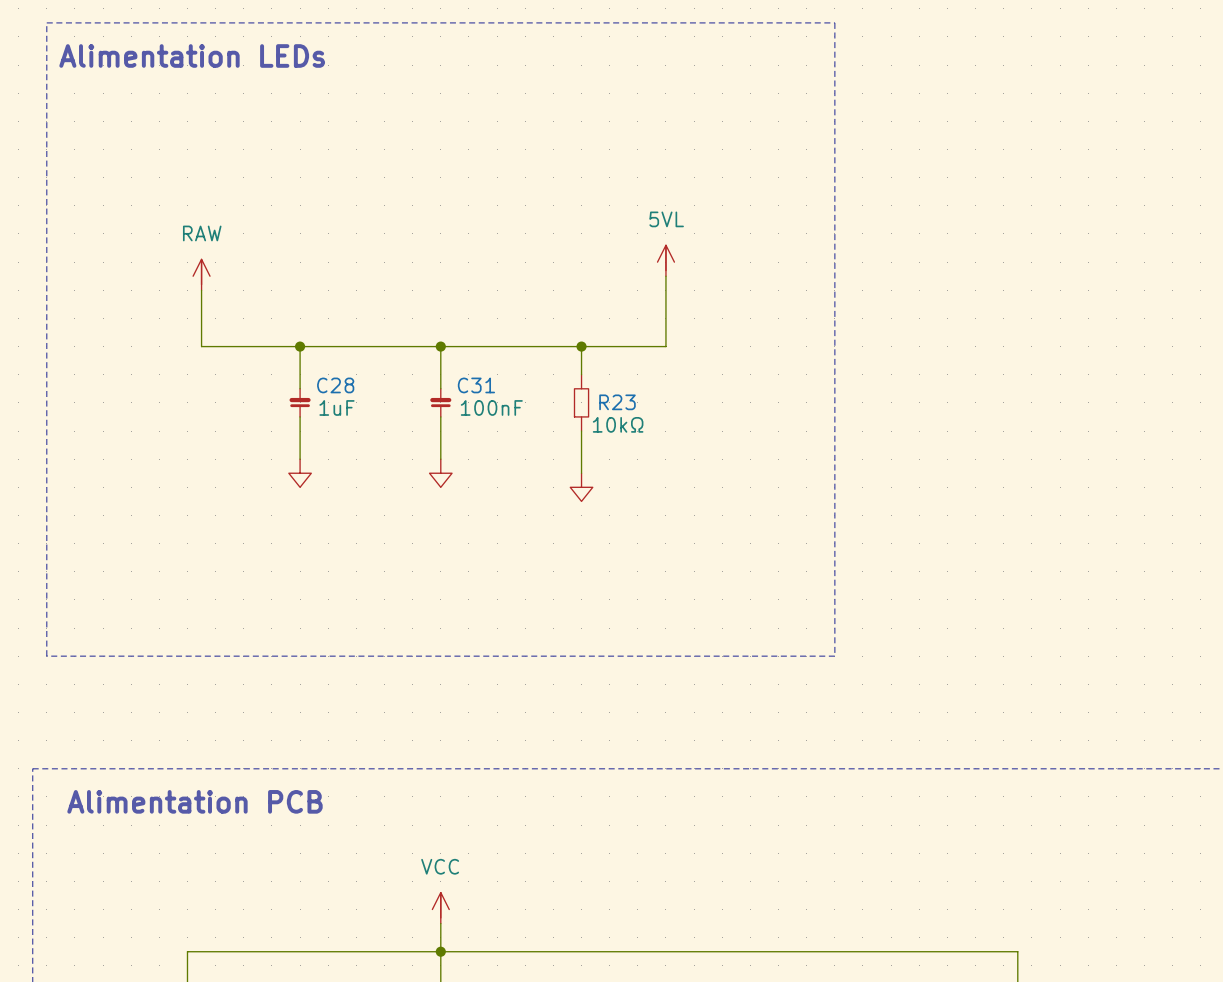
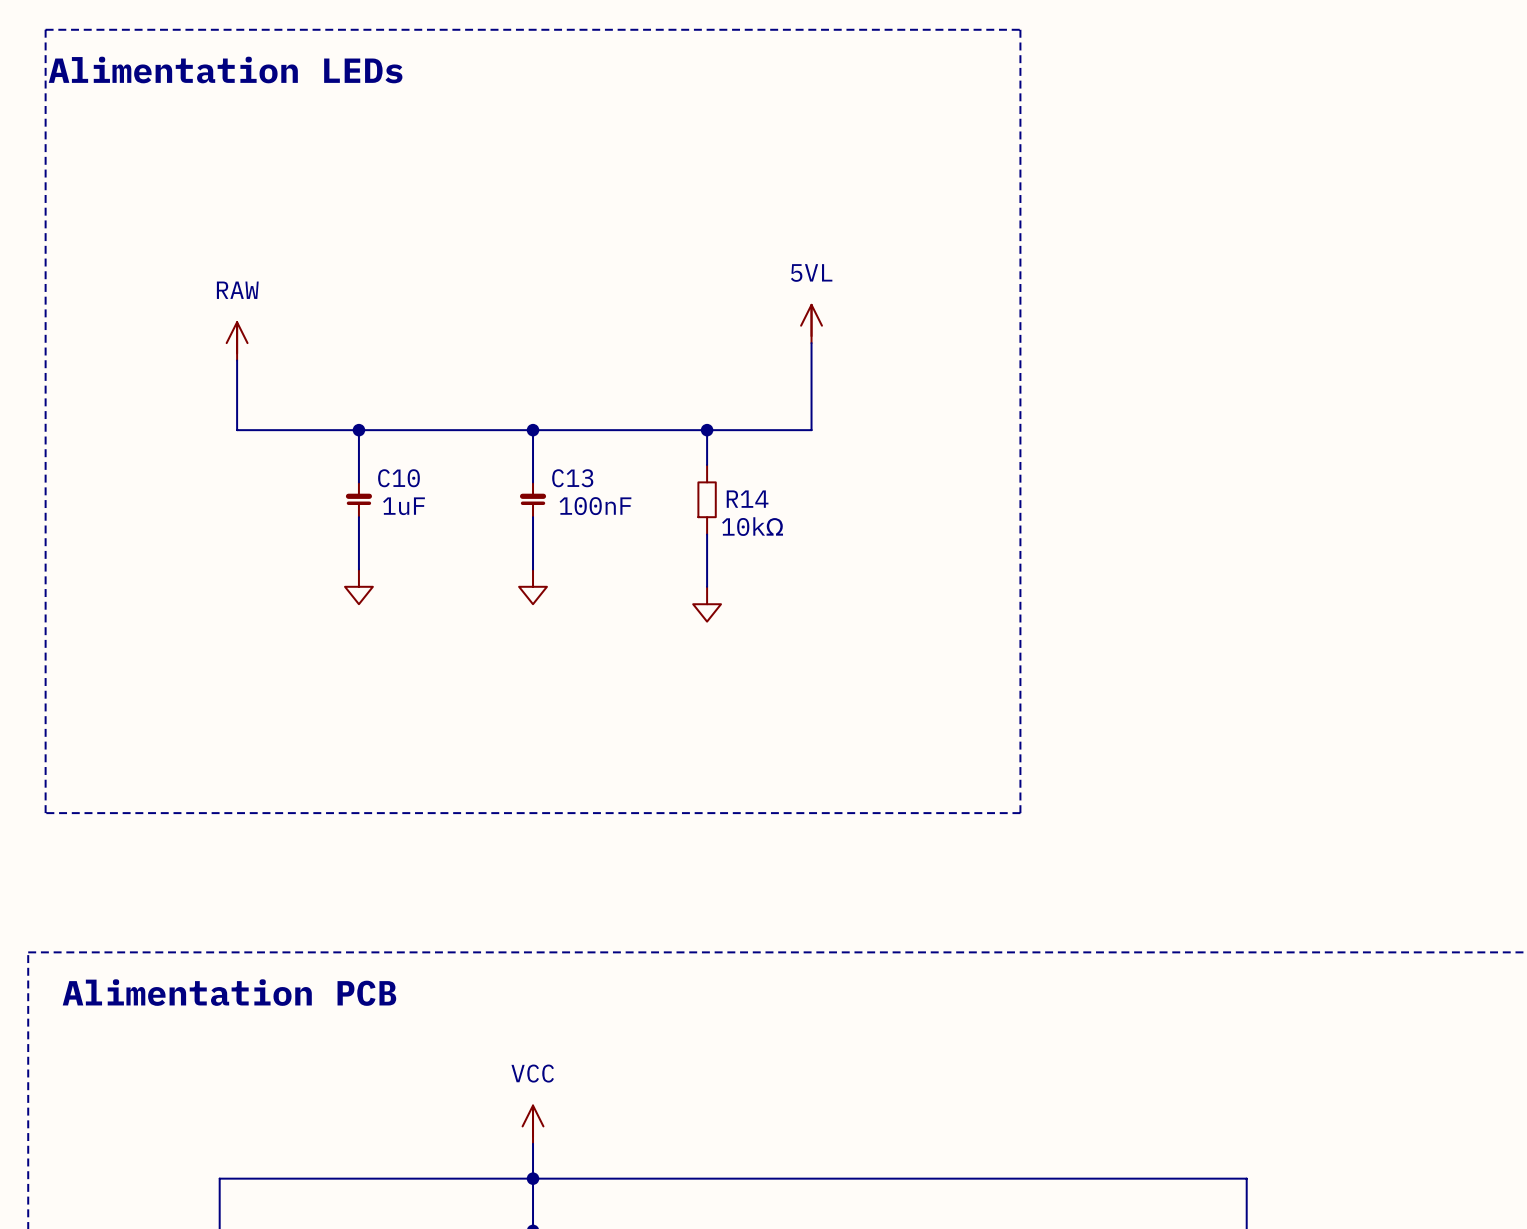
C28 name: C28 (335, 385) -> C10 (398, 478)
C31 name: C31 (476, 385) -> C13 (572, 478)
R23 name: R23 (617, 402) -> R14 (747, 499)

